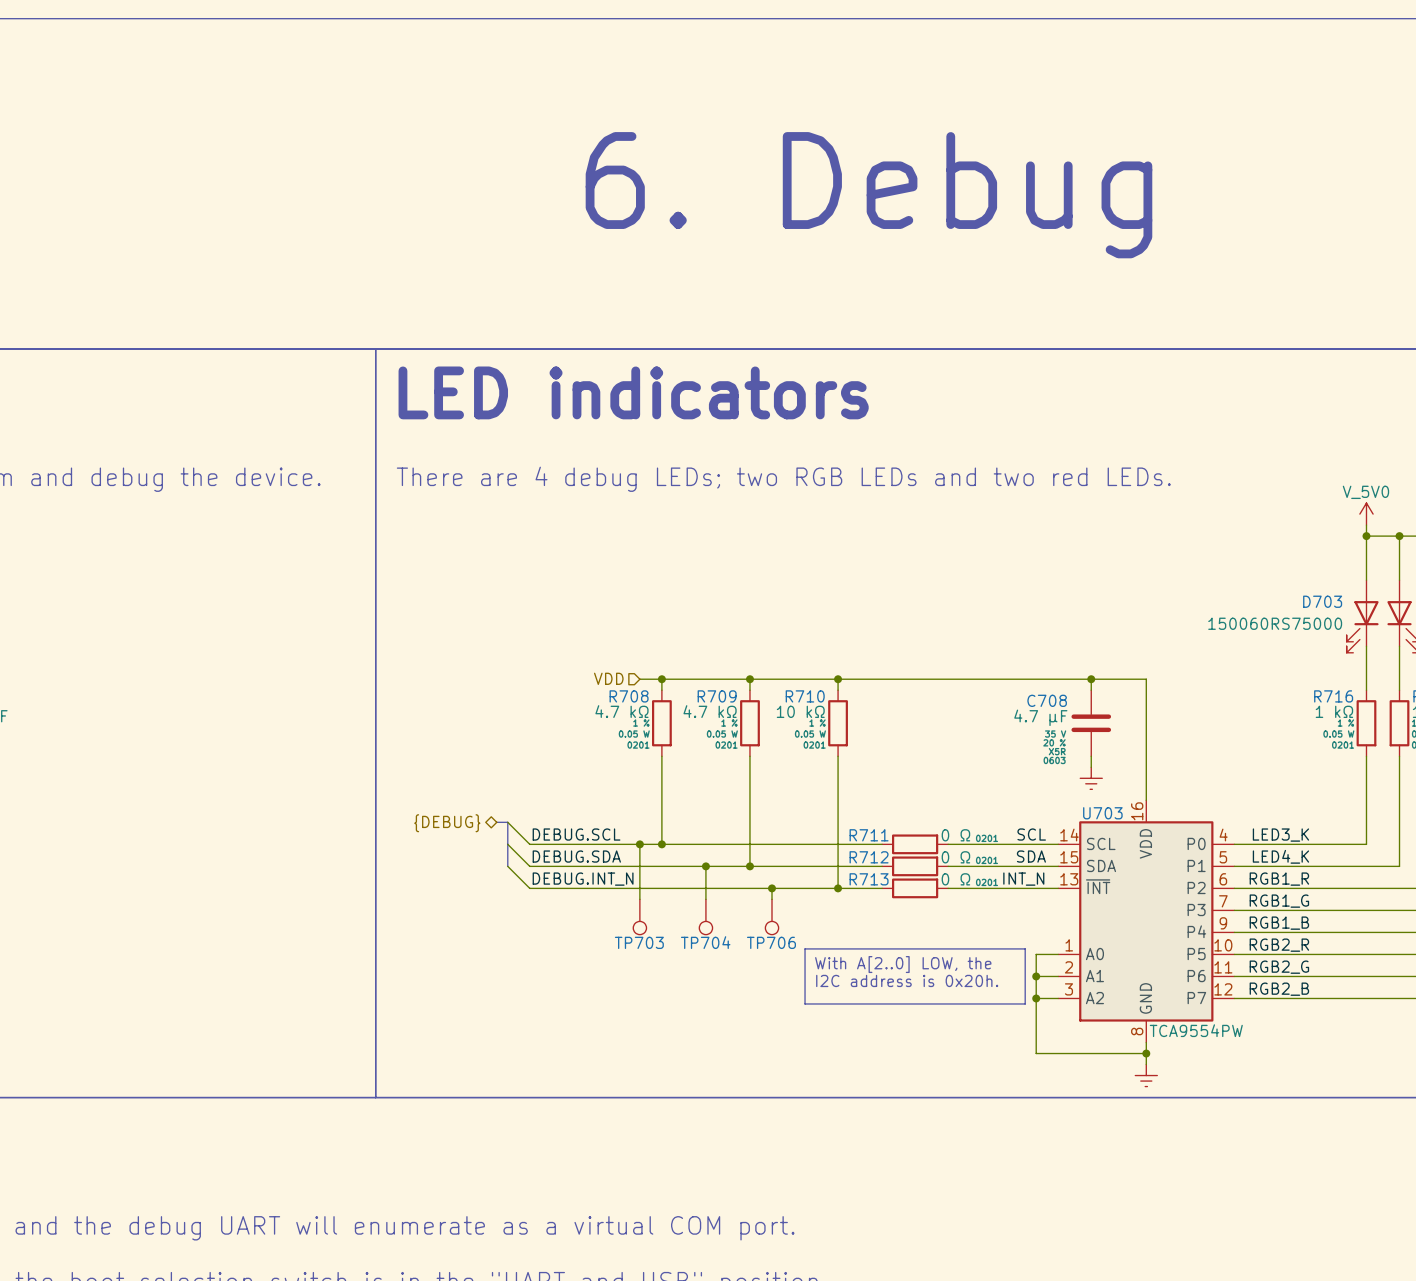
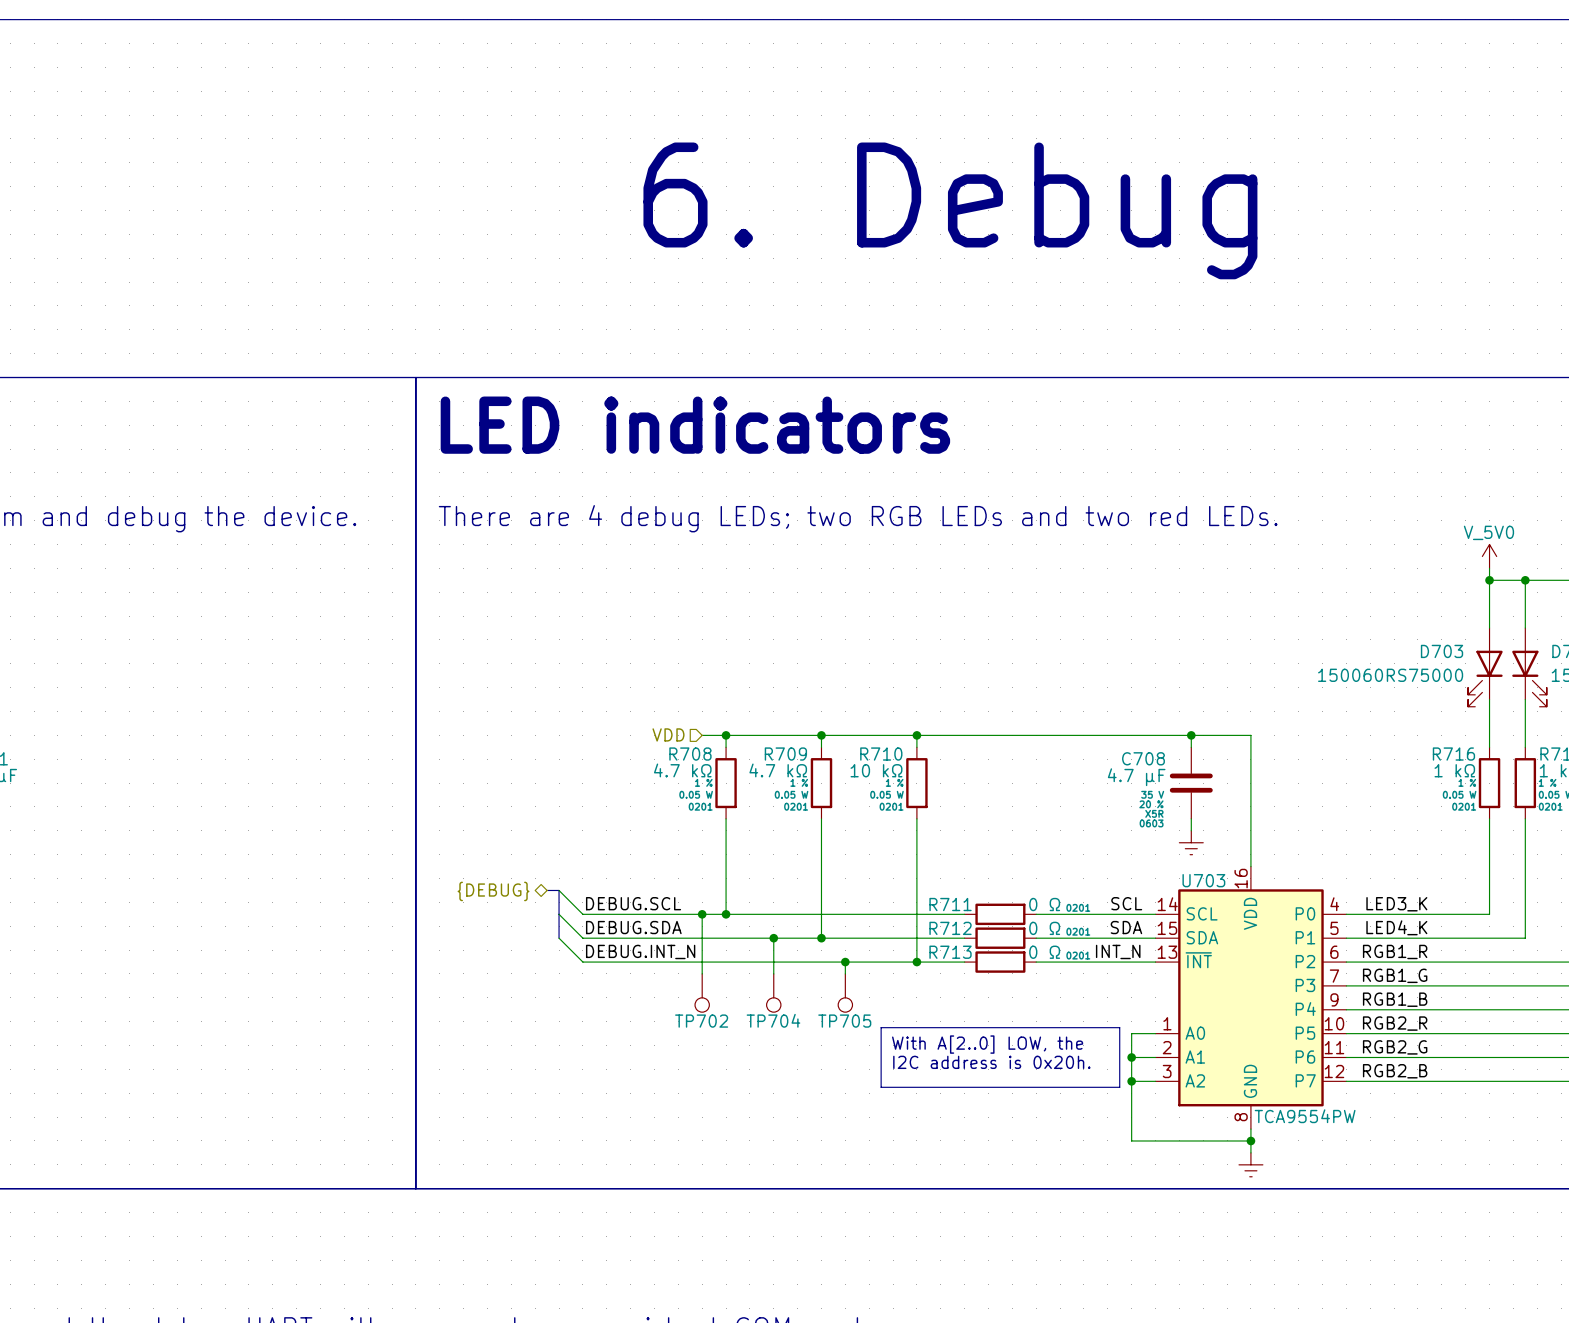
TP703 name: TP703 (639, 942) -> TP702 (701, 1021)
TP706 name: TP706 (771, 942) -> TP705 (844, 1021)

